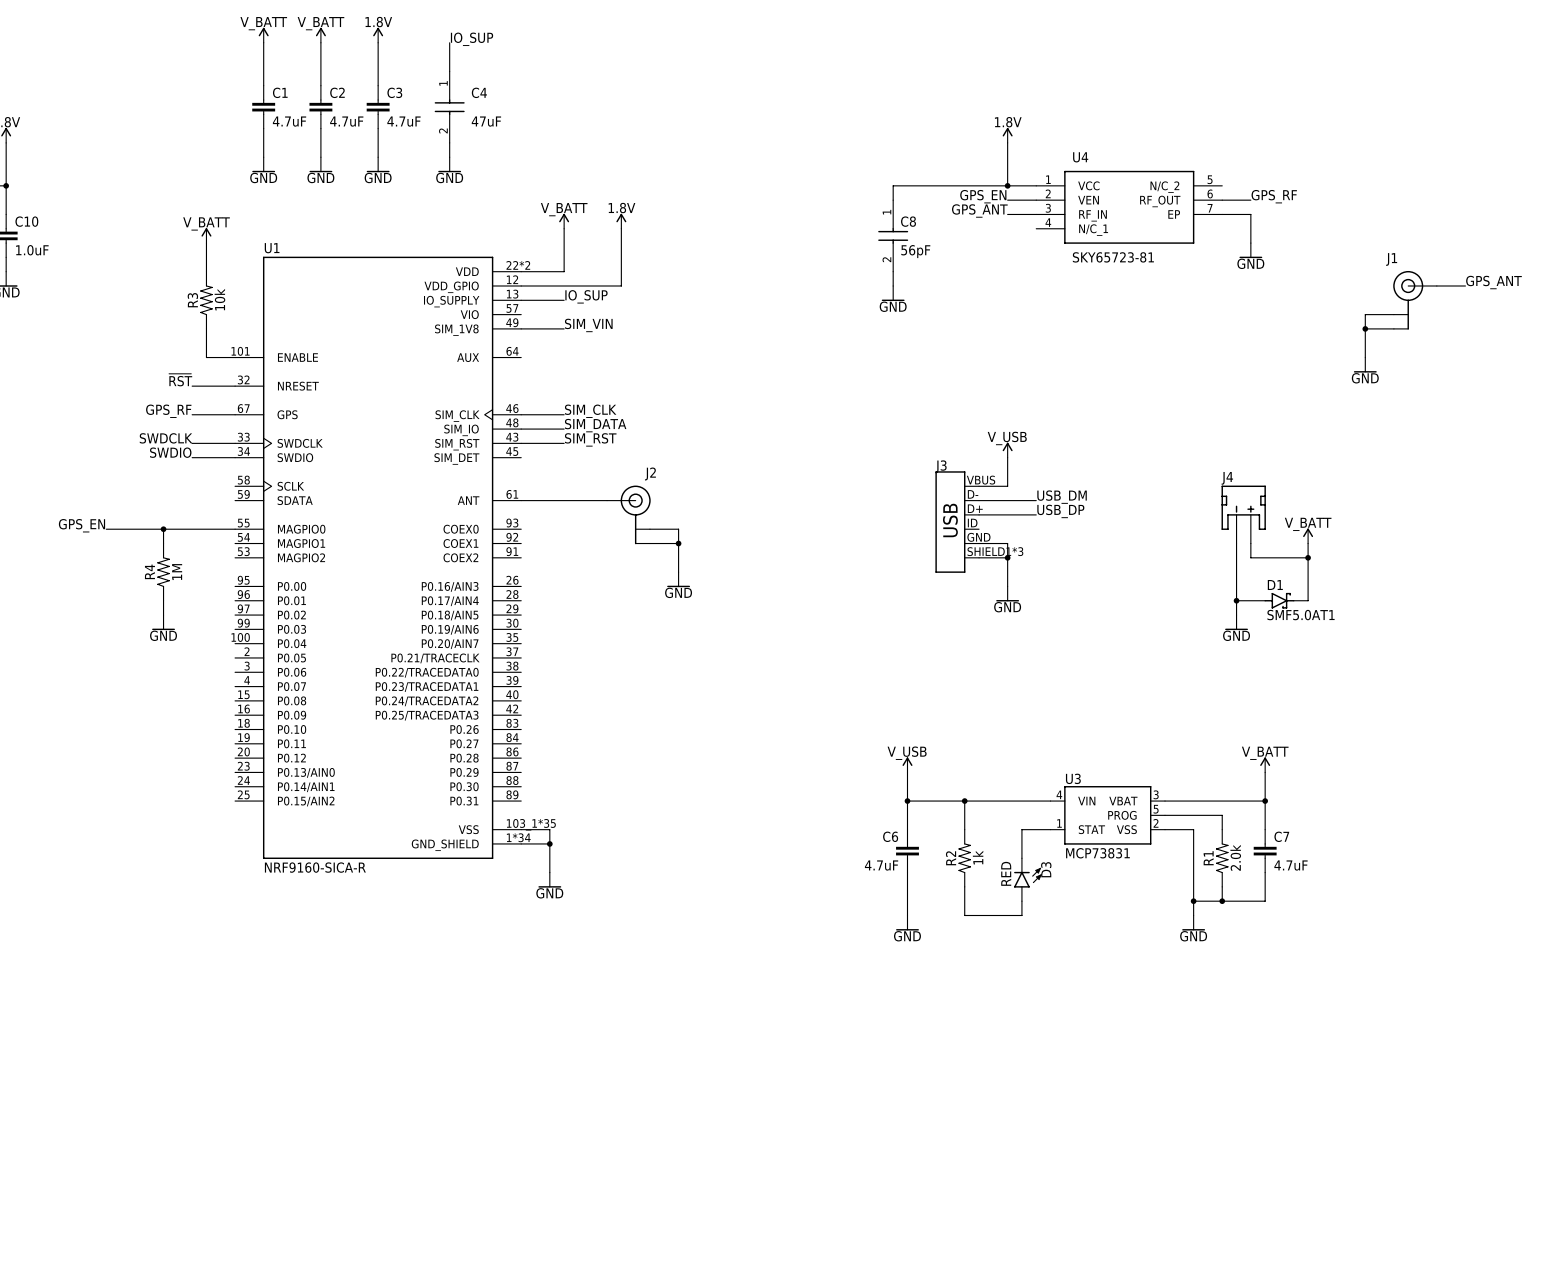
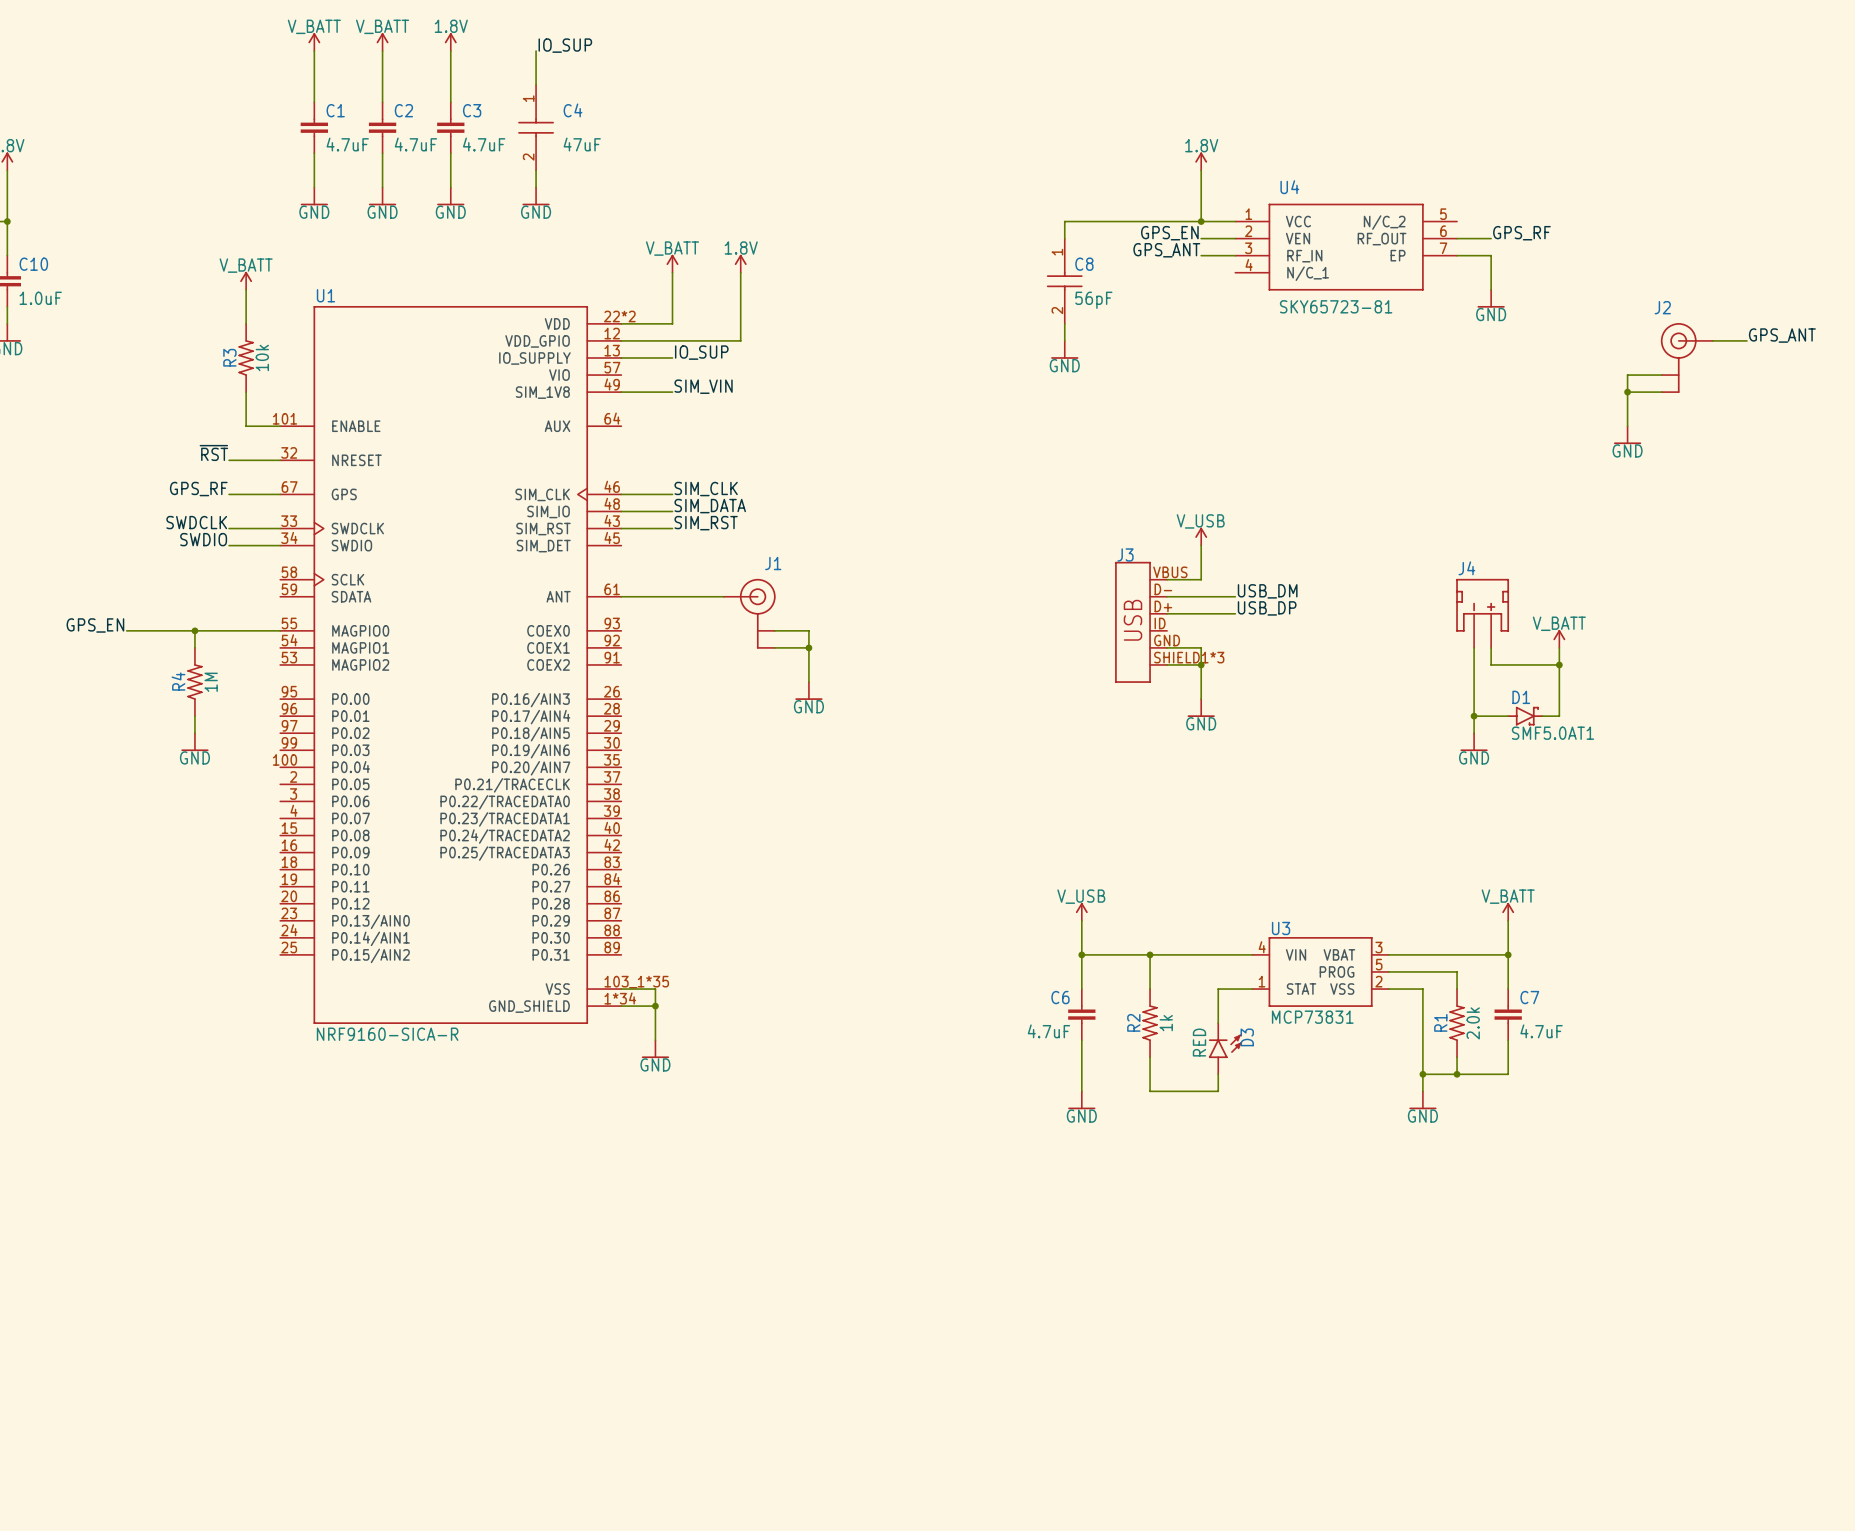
J1 name: J1 (1391, 259) -> J2 (1662, 307)
J2 name: J2 (650, 473) -> J1 (773, 563)

